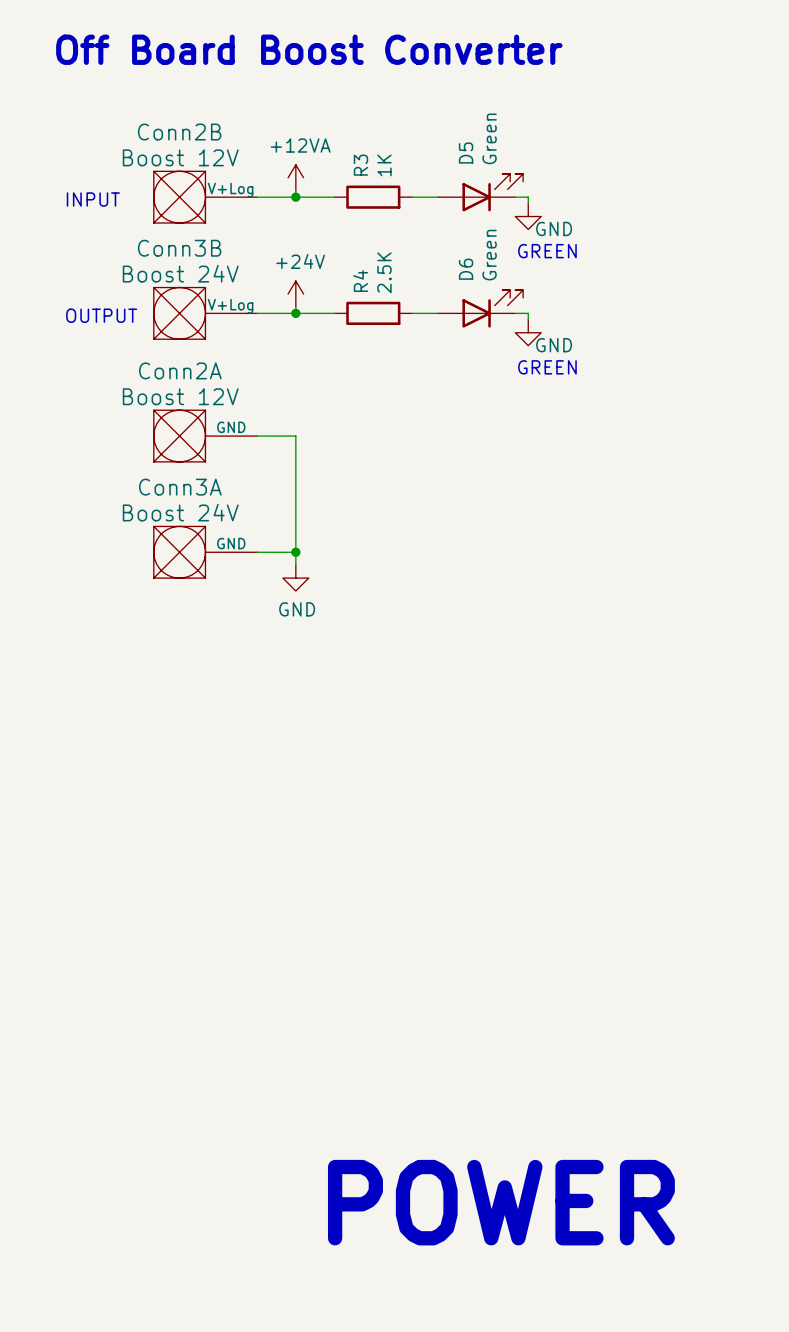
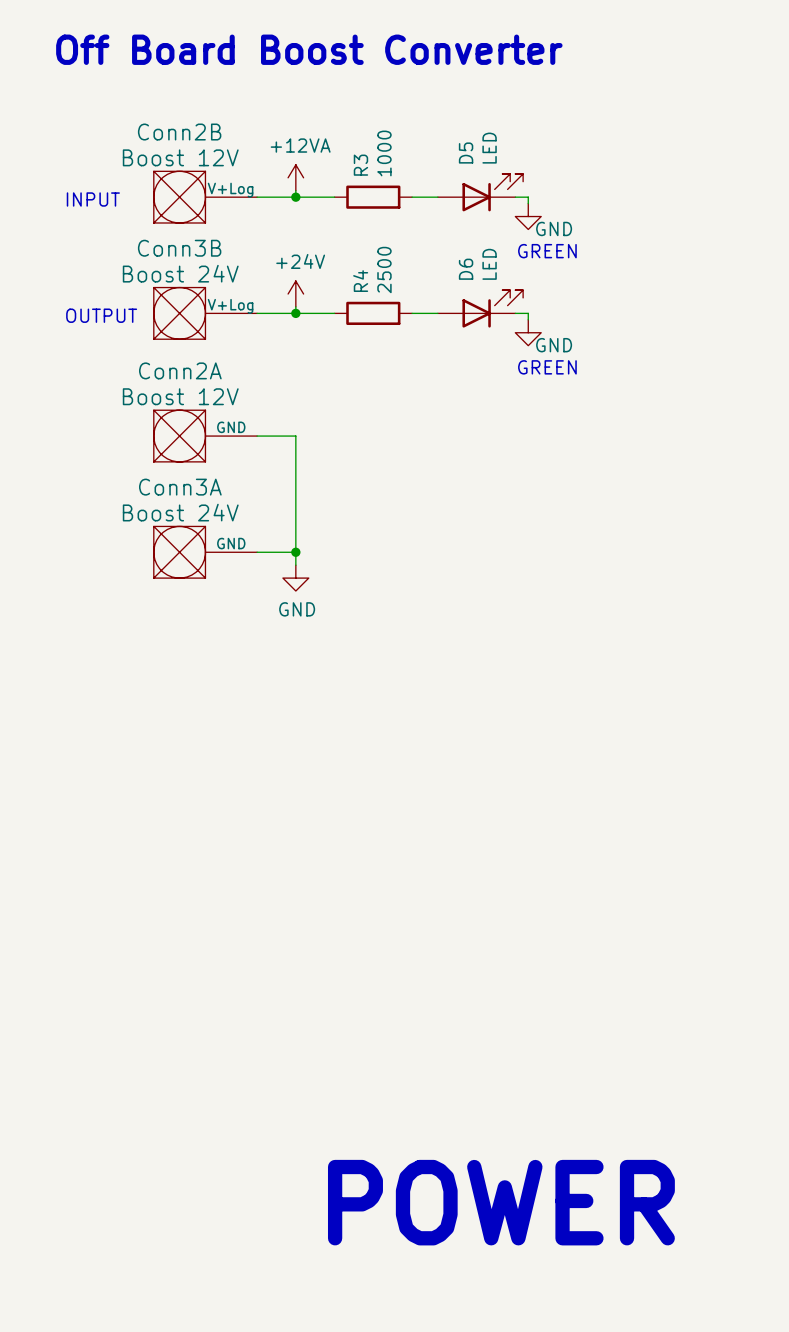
D5 value: Green (489, 138) -> LED (489, 148)
R3 value: 1K (384, 165) -> 1000 (384, 153)
D6 value: Green (489, 255) -> LED (489, 264)
R4 value: 2.5K (384, 272) -> 2500 (384, 269)

